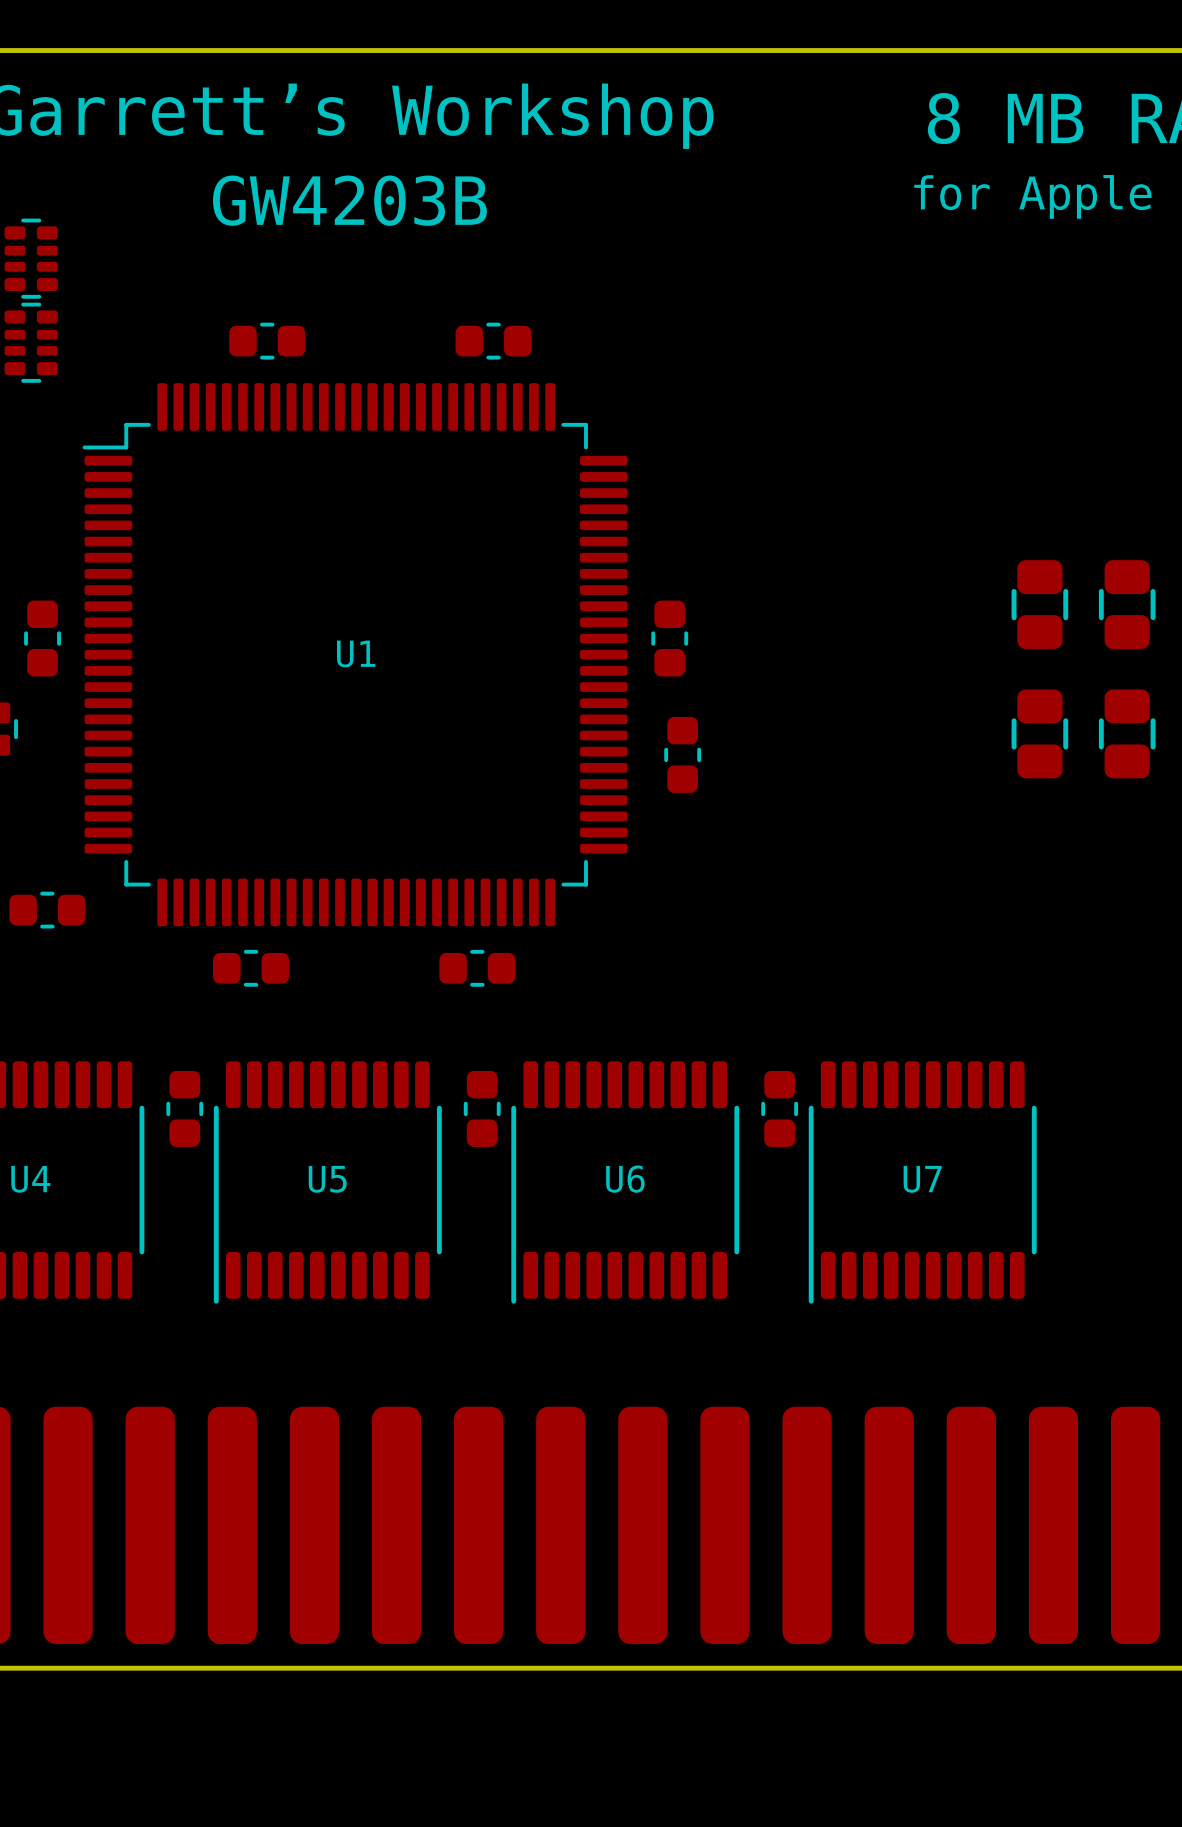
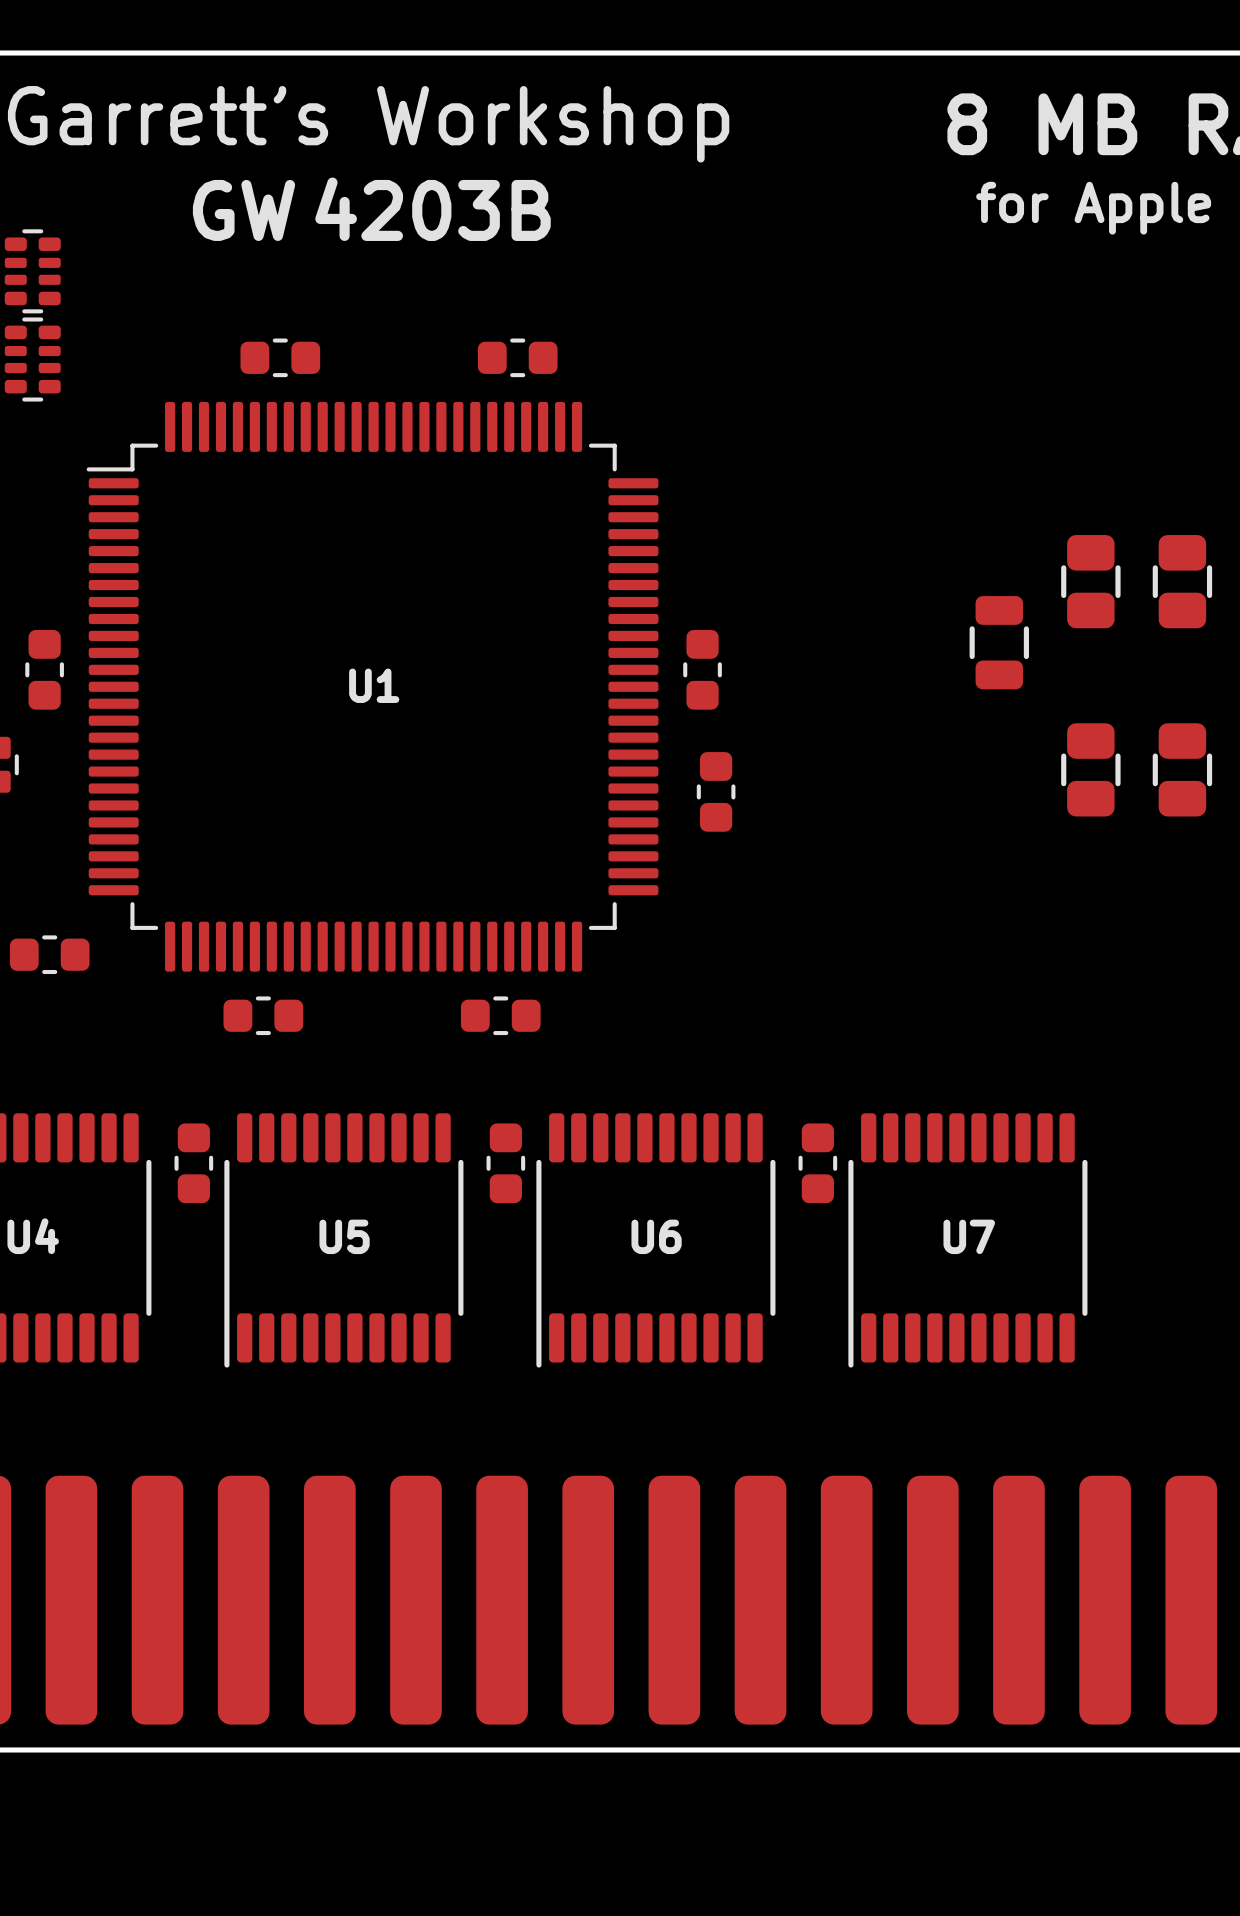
part: none -> (1090, 581)
part: none -> (1182, 581)
part: (1039, 604) -> none
part: (1127, 604) -> none
part: none -> (999, 642)

